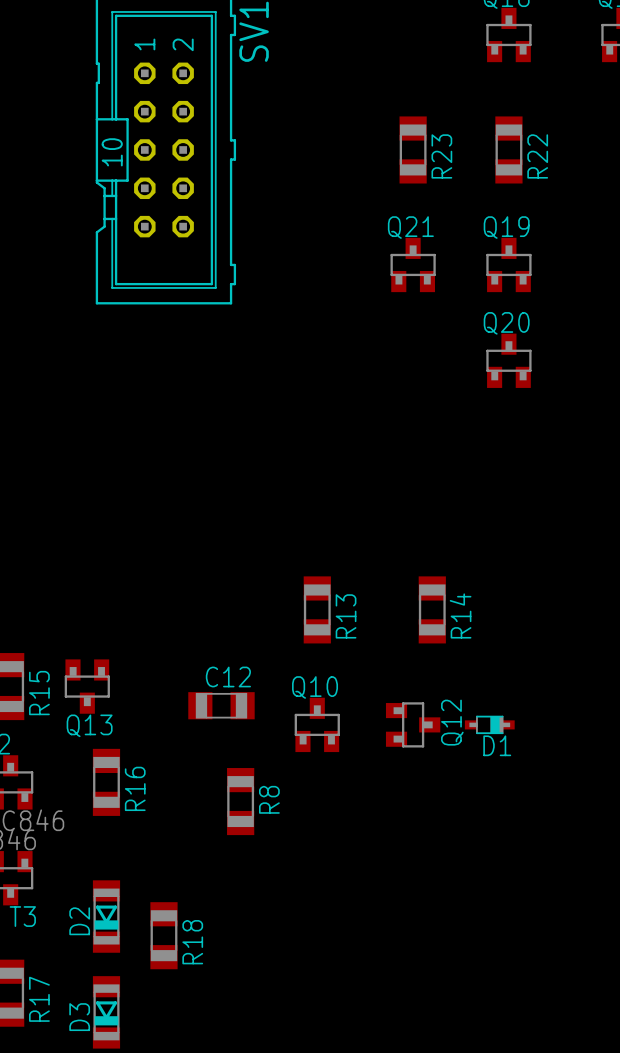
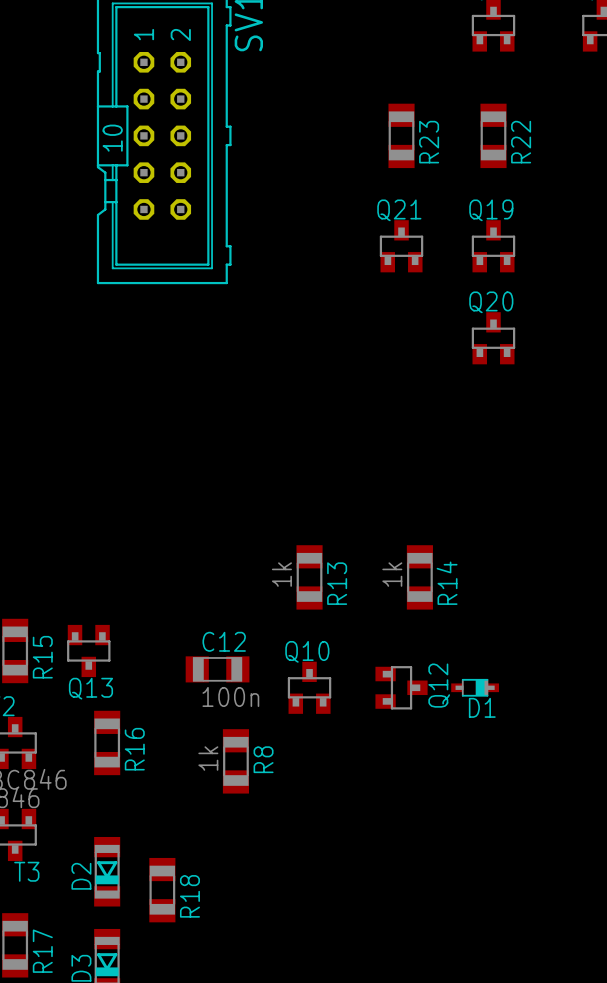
R13 value: none -> 1k (281, 574)
R14 value: none -> 1k (392, 574)
C12 value: none -> 100n (230, 696)
R8 value: none -> 1k (208, 758)

